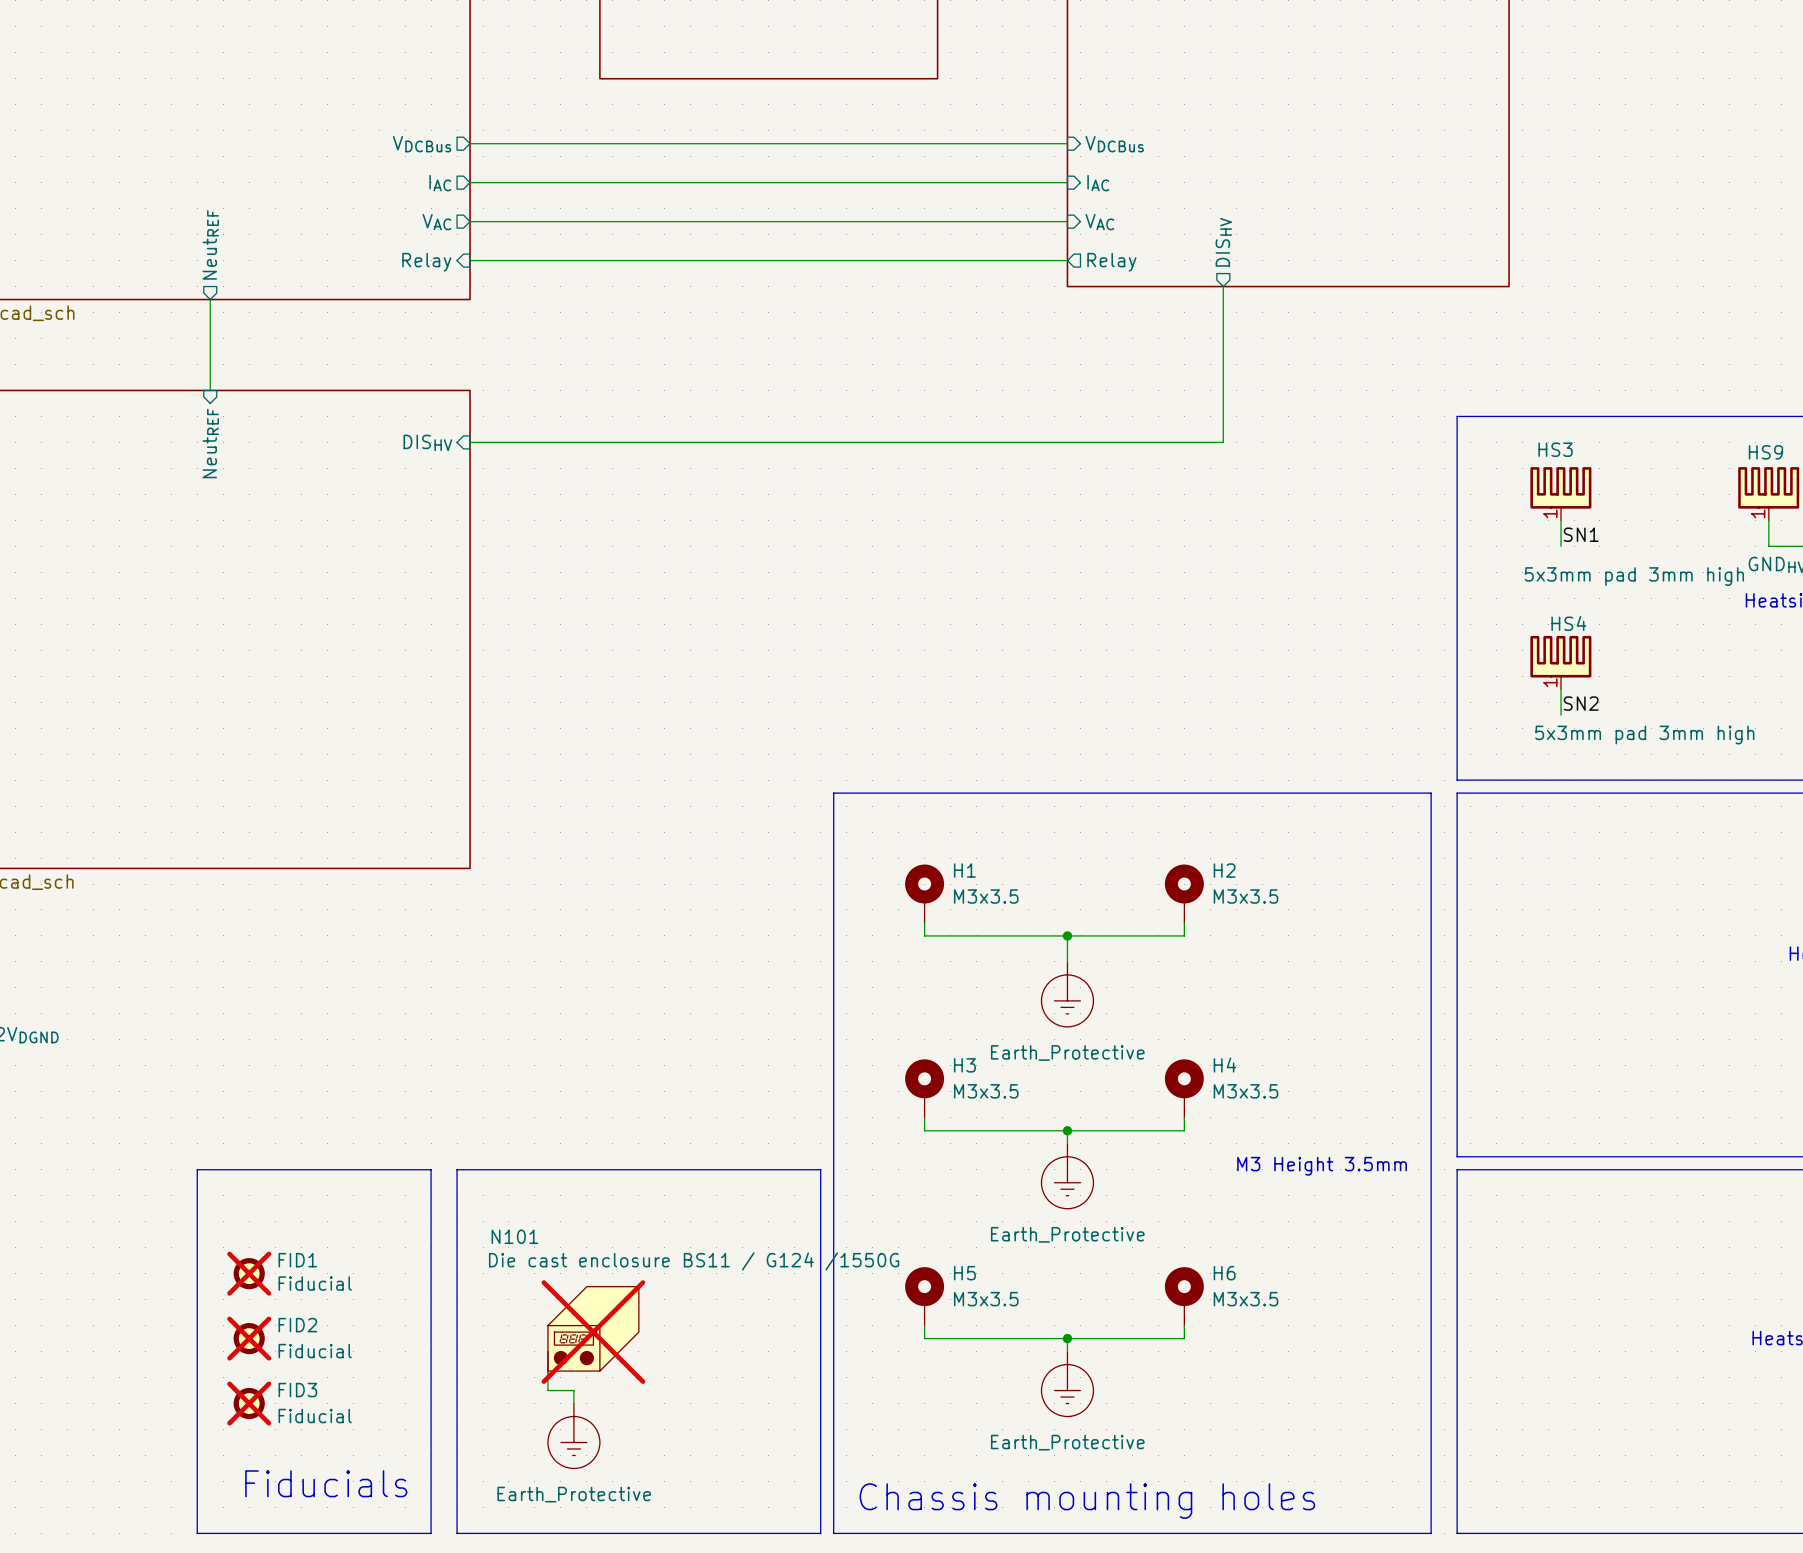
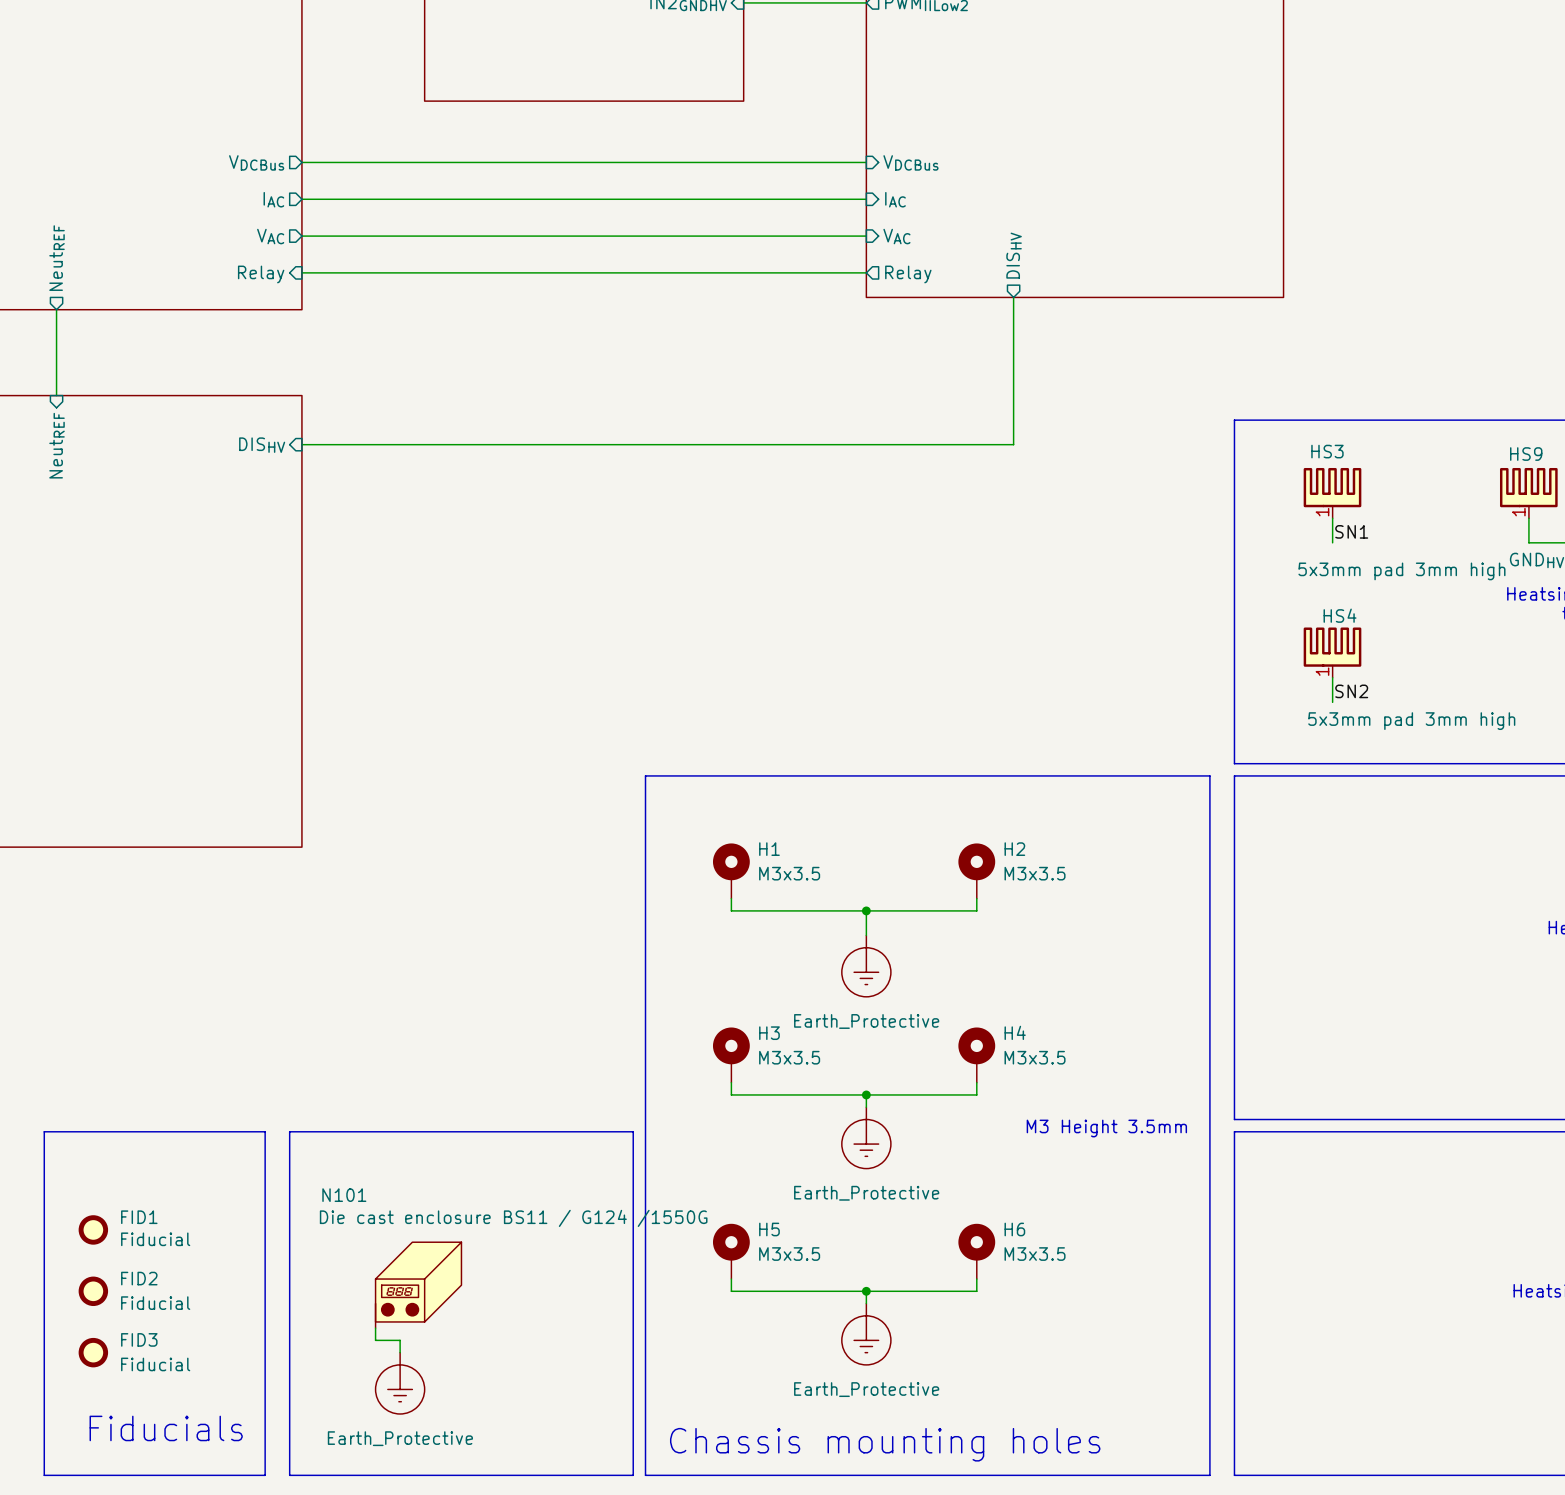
FID1 do-not-place cross: (249, 1273) -> none
N101 do-not-place cross: (593, 1332) -> none
FID2 do-not-place cross: (249, 1338) -> none
FID3 do-not-place cross: (249, 1403) -> none

